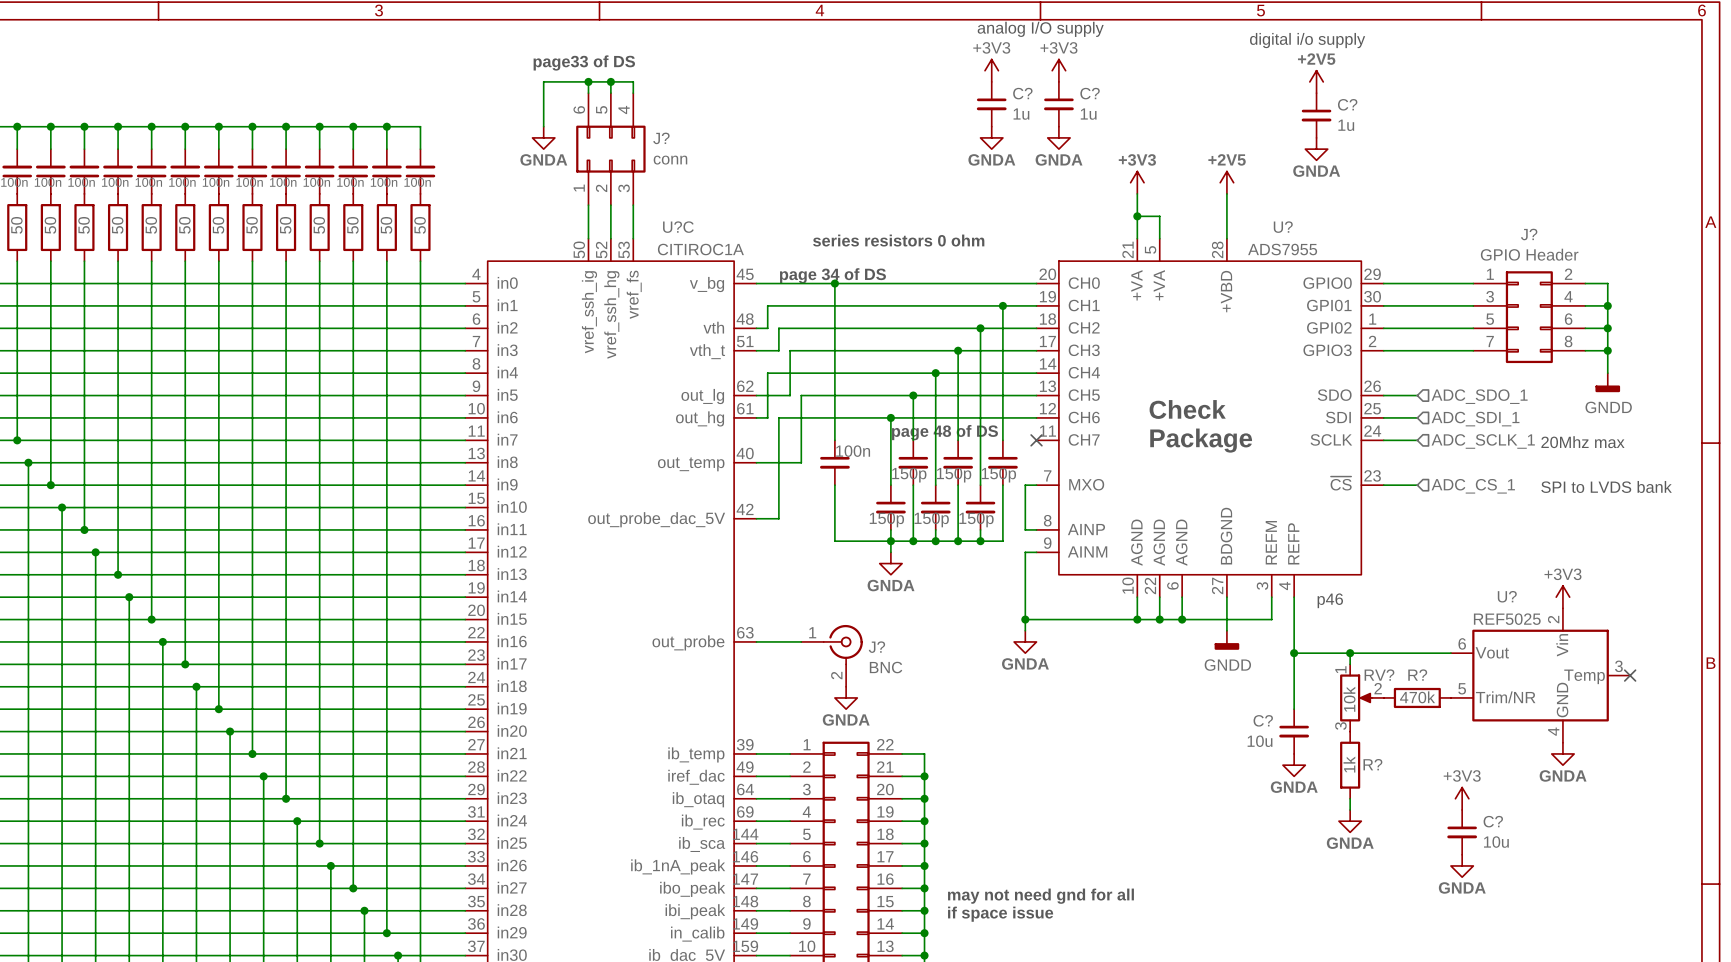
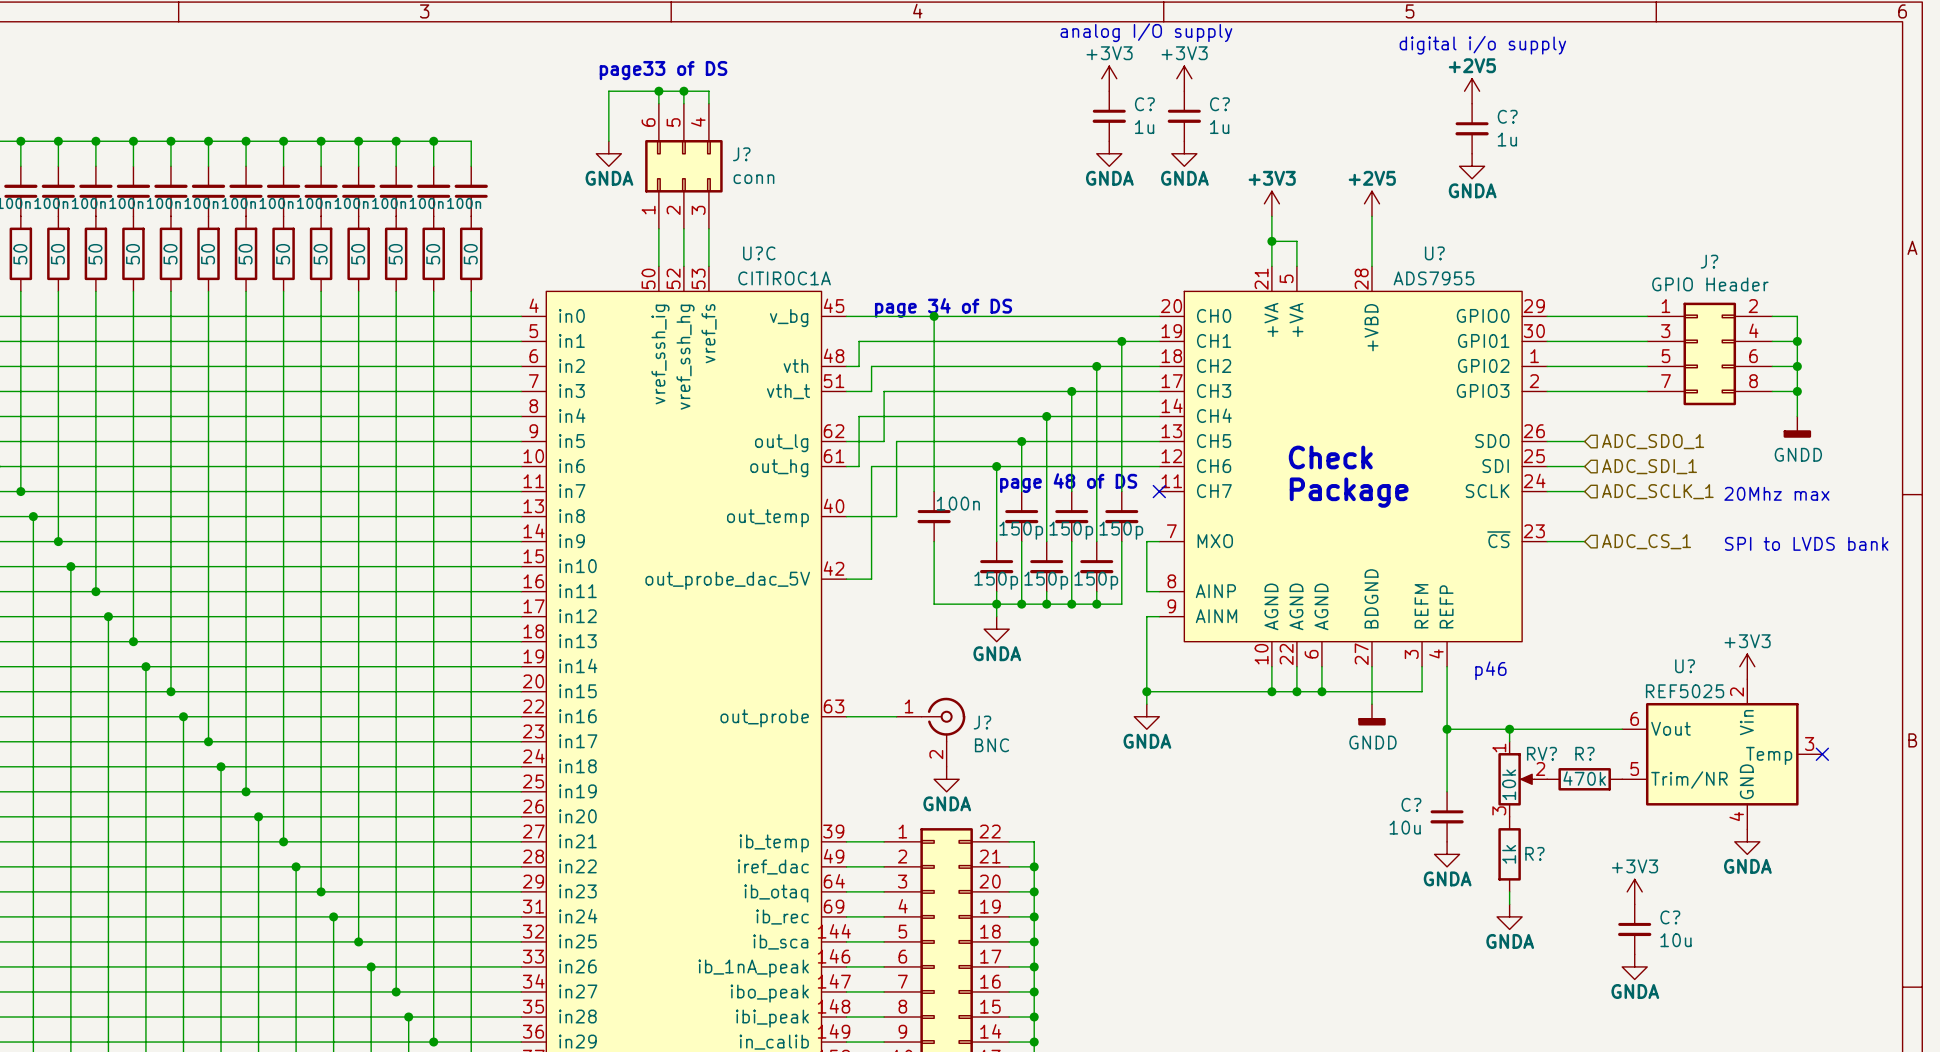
text: series resistors 0 ohm (898, 240) -> none
text: may not need gnd for all (1040, 896) -> none
text: if space issue (1000, 914) -> none

